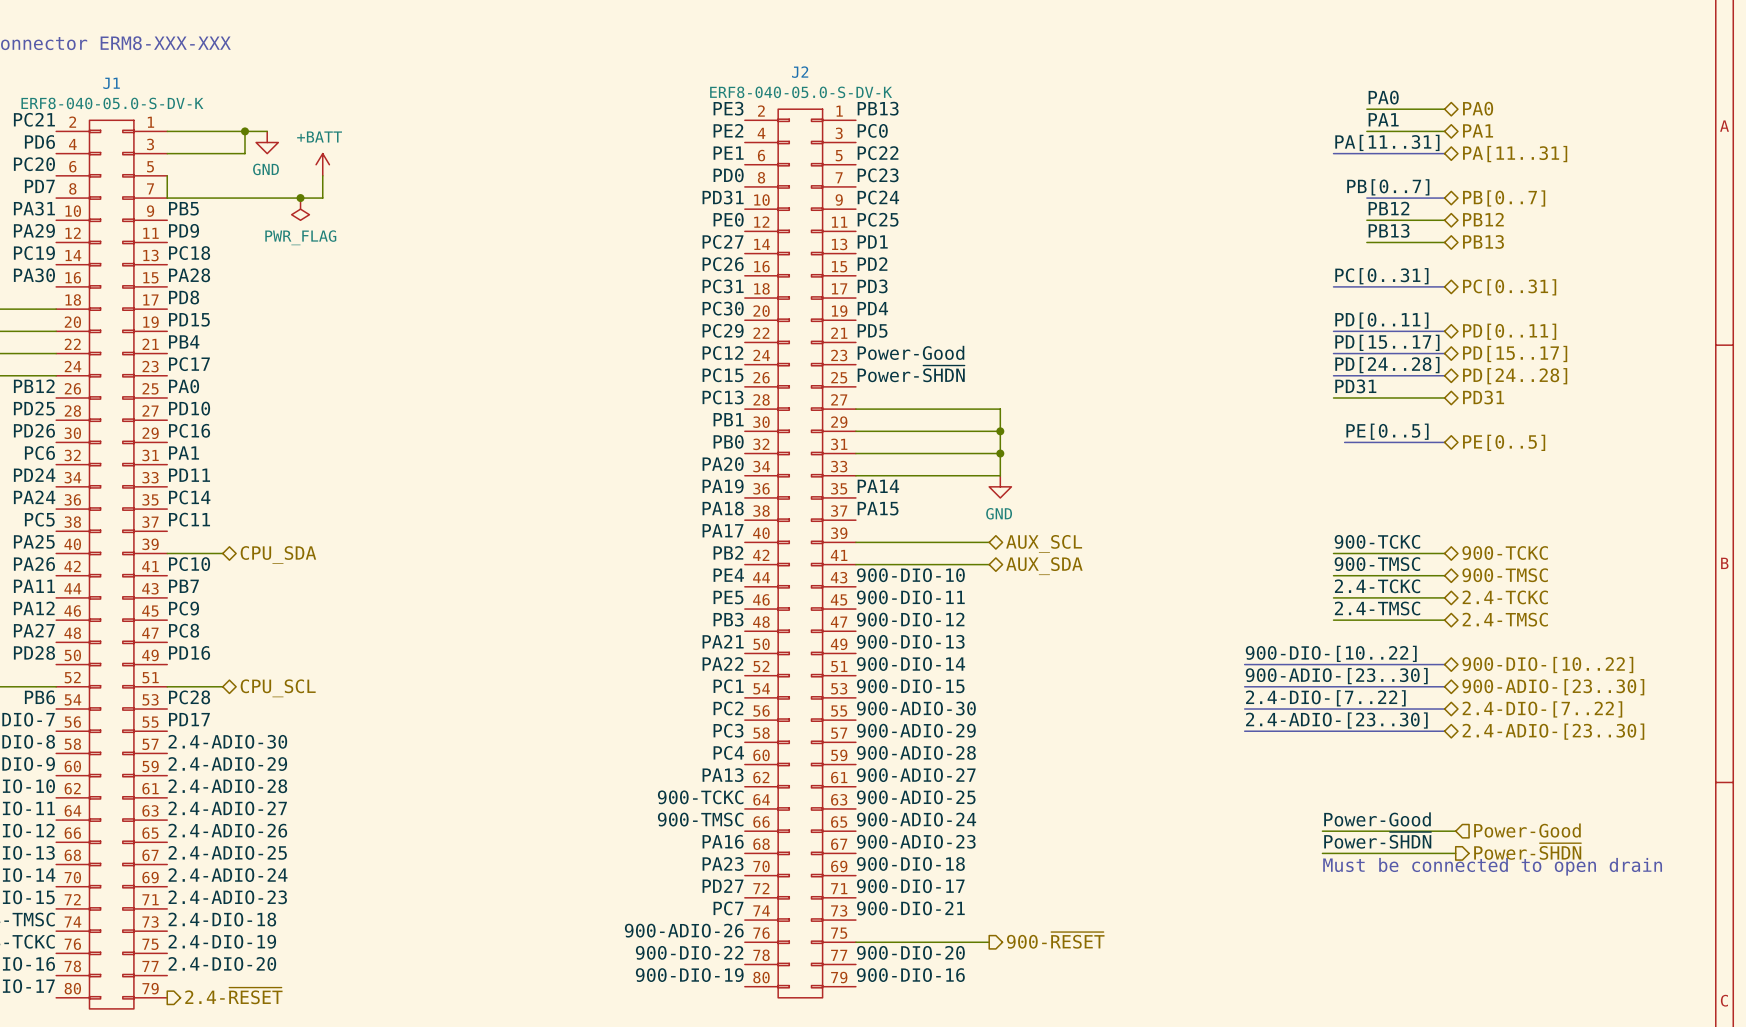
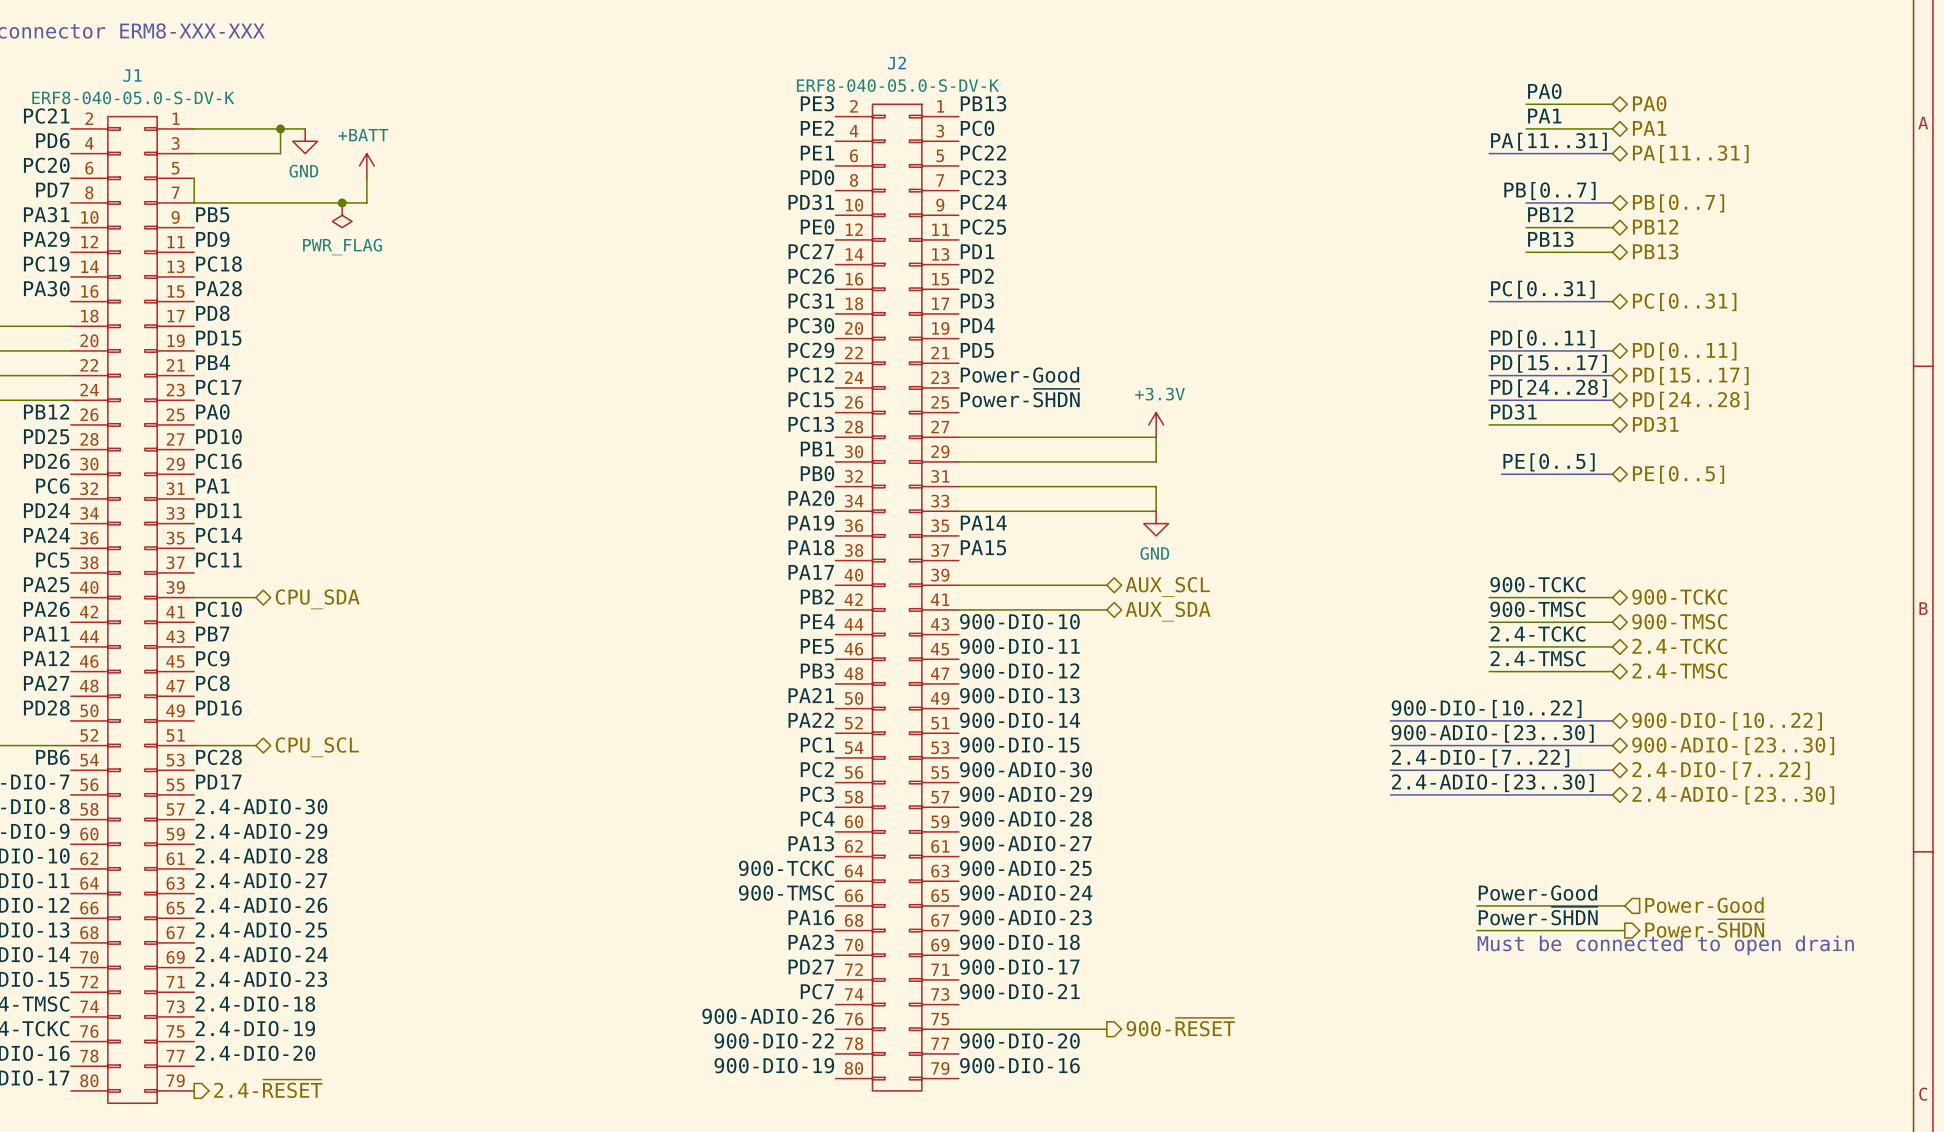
power symbol: none -> +3.3V (1156, 424)
wire: (1000, 409) (1000, 475) -> (1119, 486) (1156, 486) (1156, 511) (1119, 511)
wire: none -> (1119, 437) (1156, 437) (1156, 461) (1119, 461)
junction: (1000, 431) -> none
junction: (1000, 453) -> none
power symbol position: GND (1000, 486) -> GND (1156, 523)

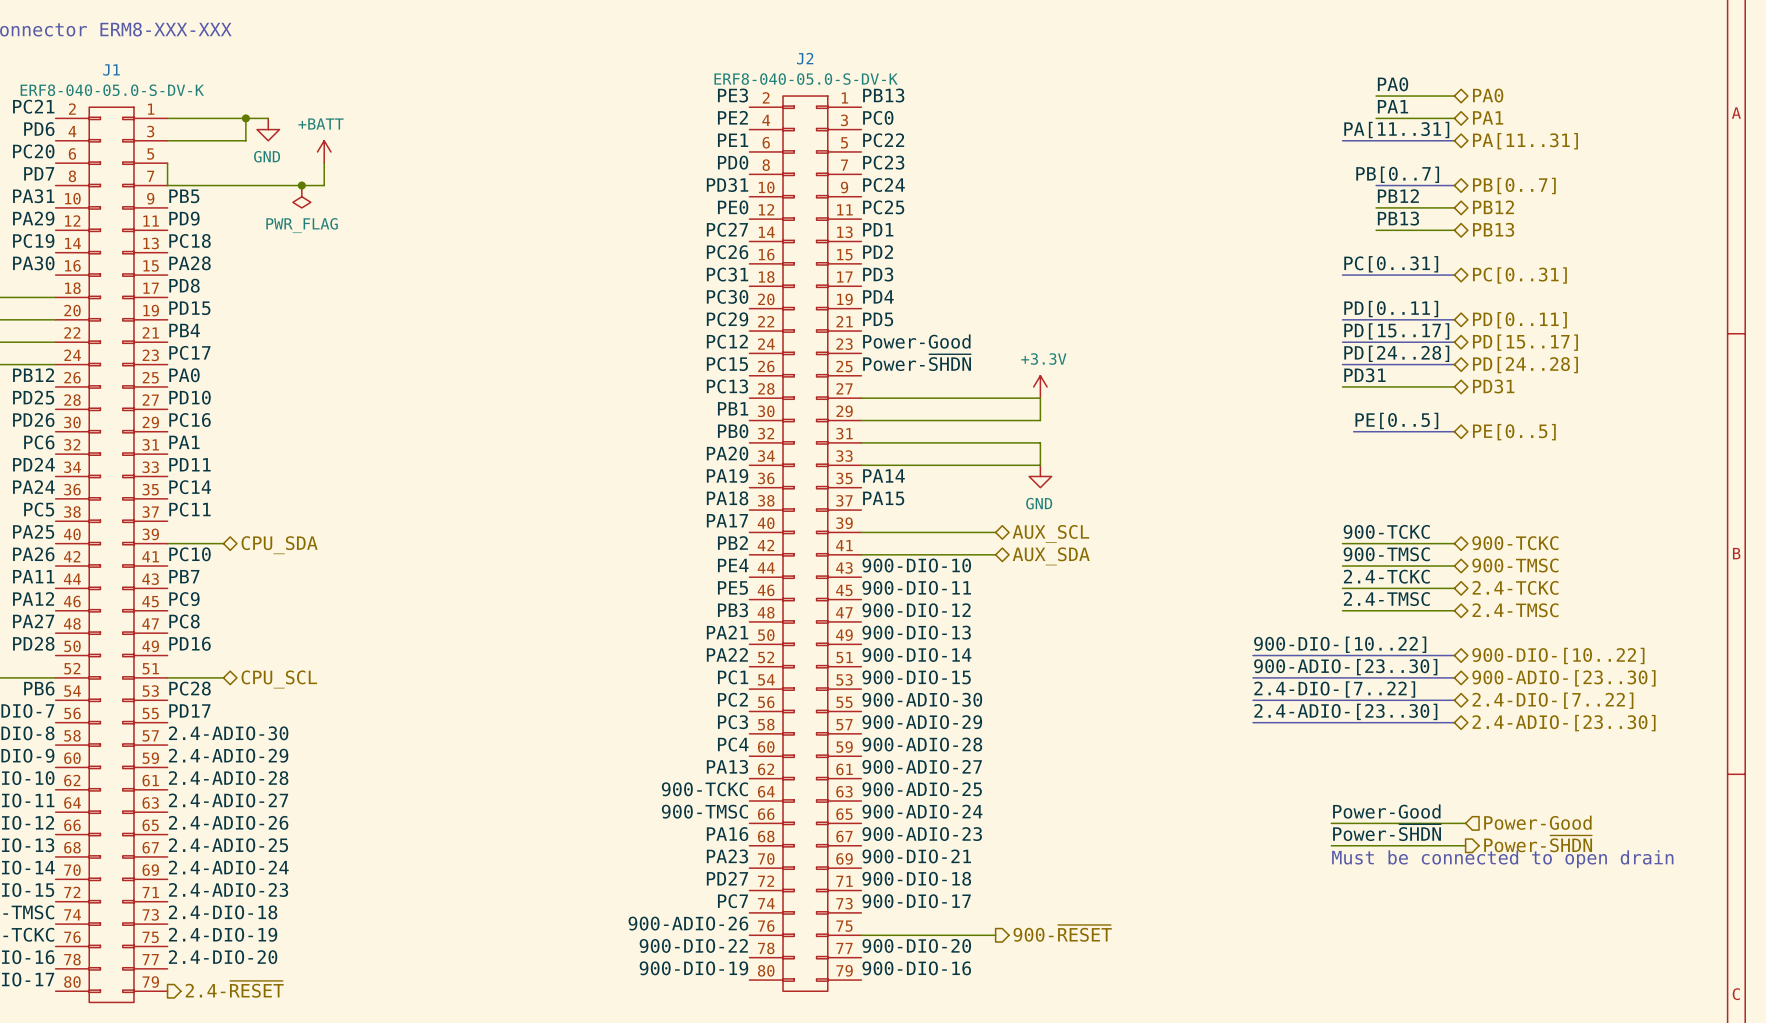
label: 900-DIO-18 (1019, 942) -> 900-DIO-21 (916, 856)
label: 900-DIO-17 (1019, 967) -> 900-DIO-18 (916, 878)
label: 900-DIO-21 (1019, 991) -> 900-DIO-17 (916, 901)

